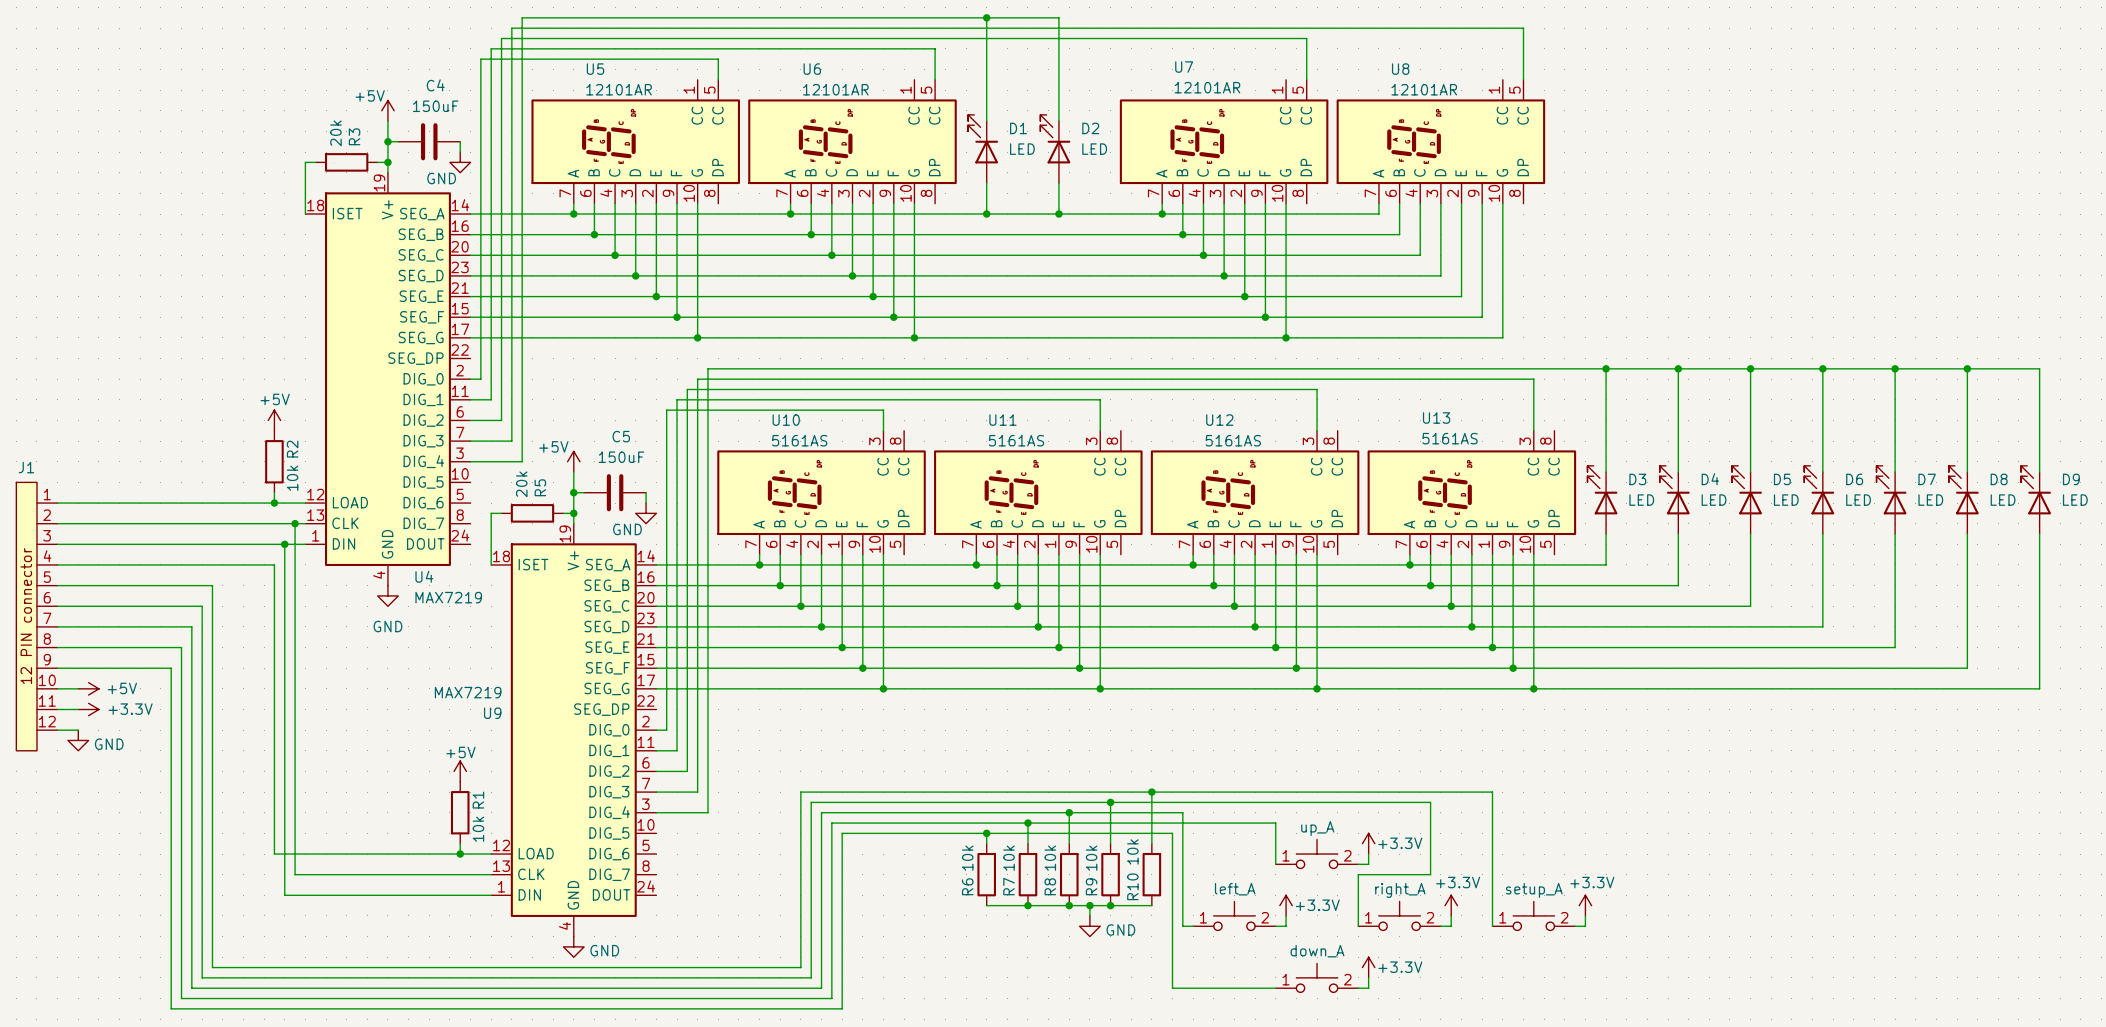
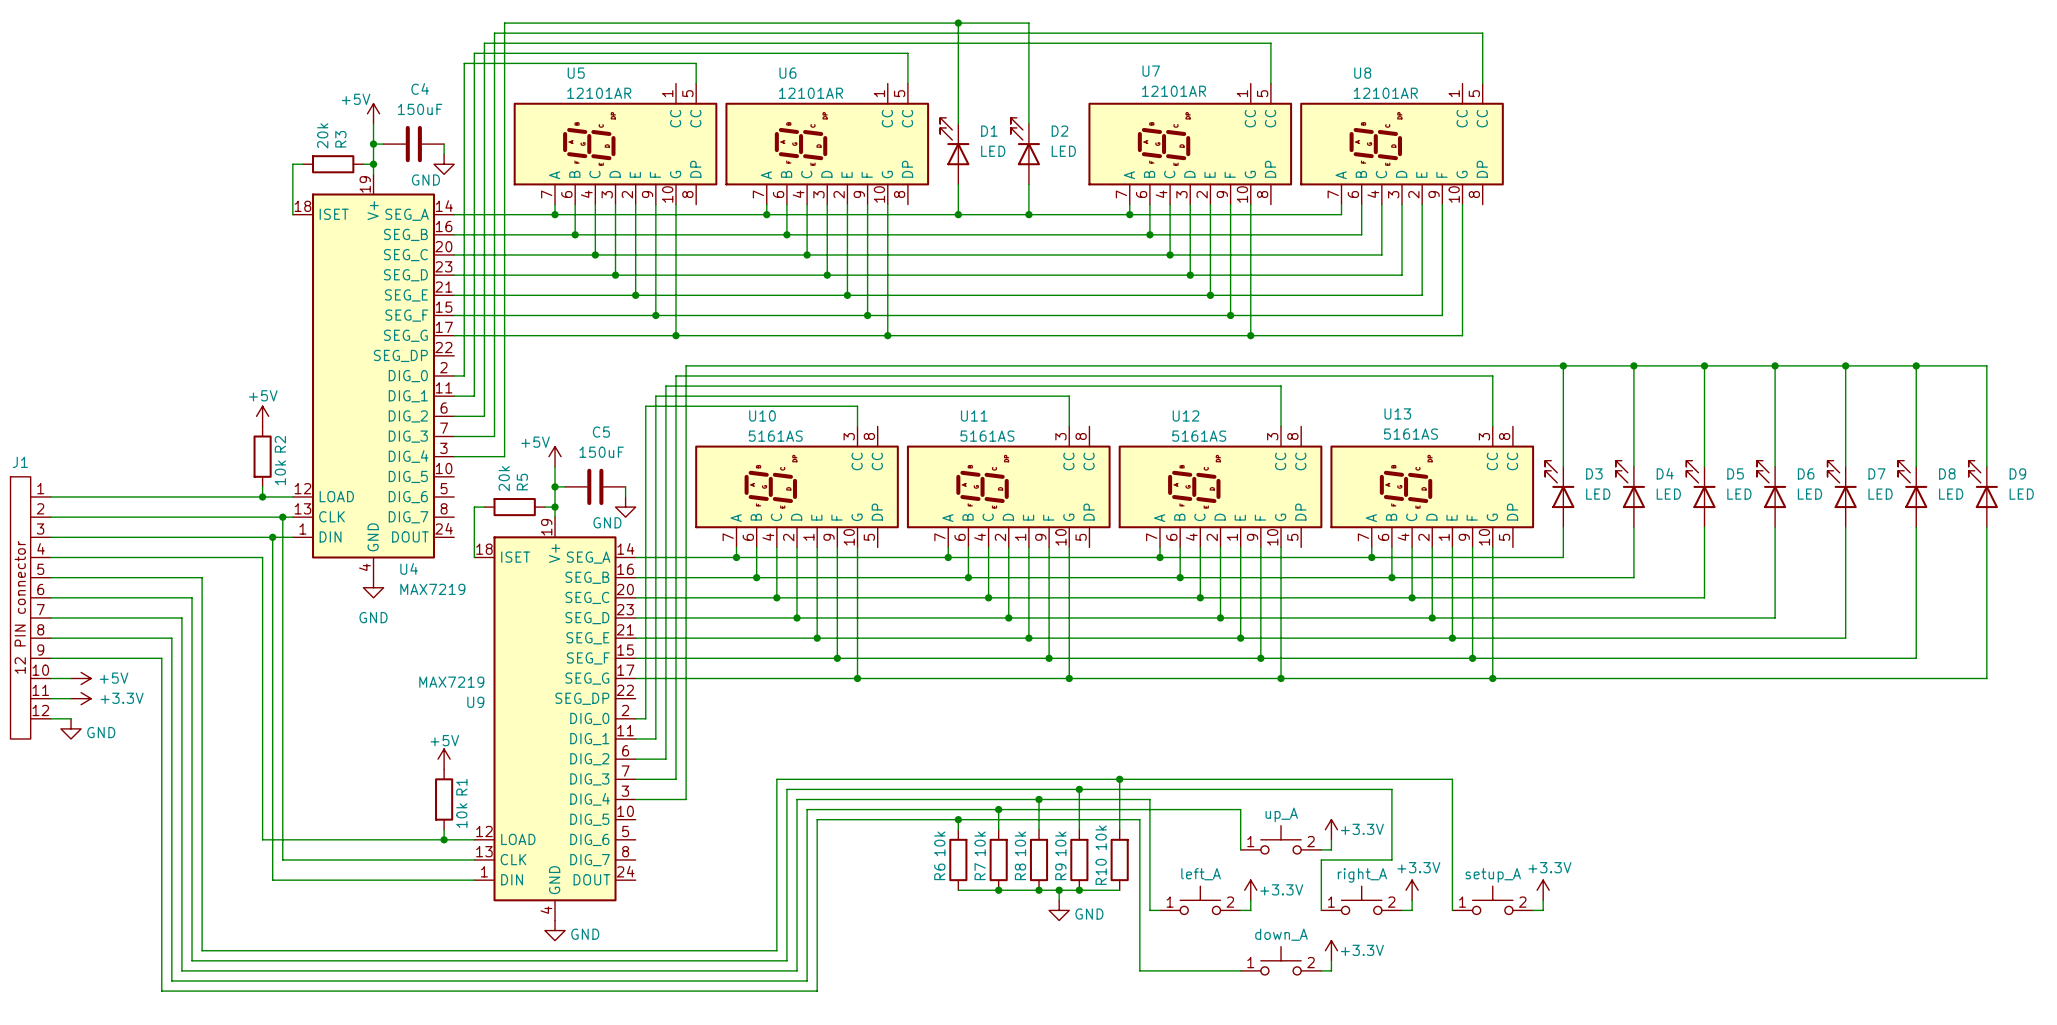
J1 symbol: [16, 482, 58, 751] -> [10, 476, 51, 739]

